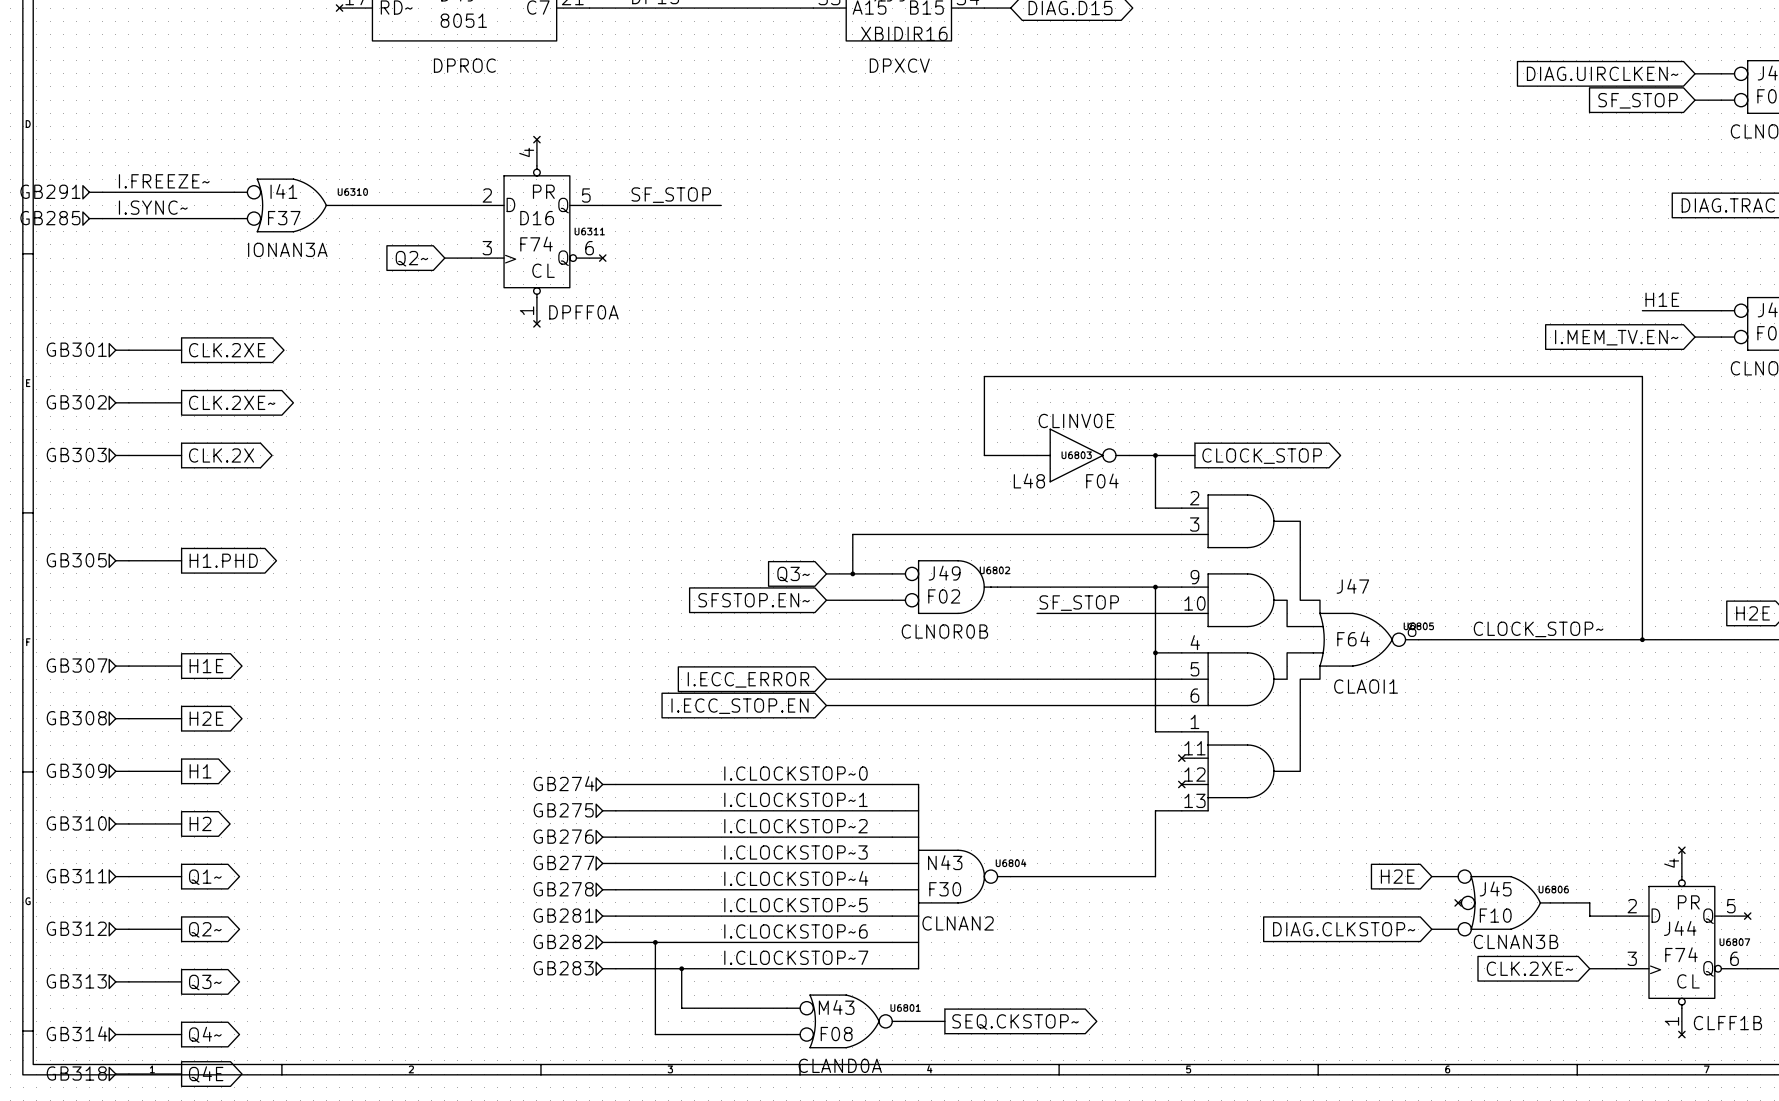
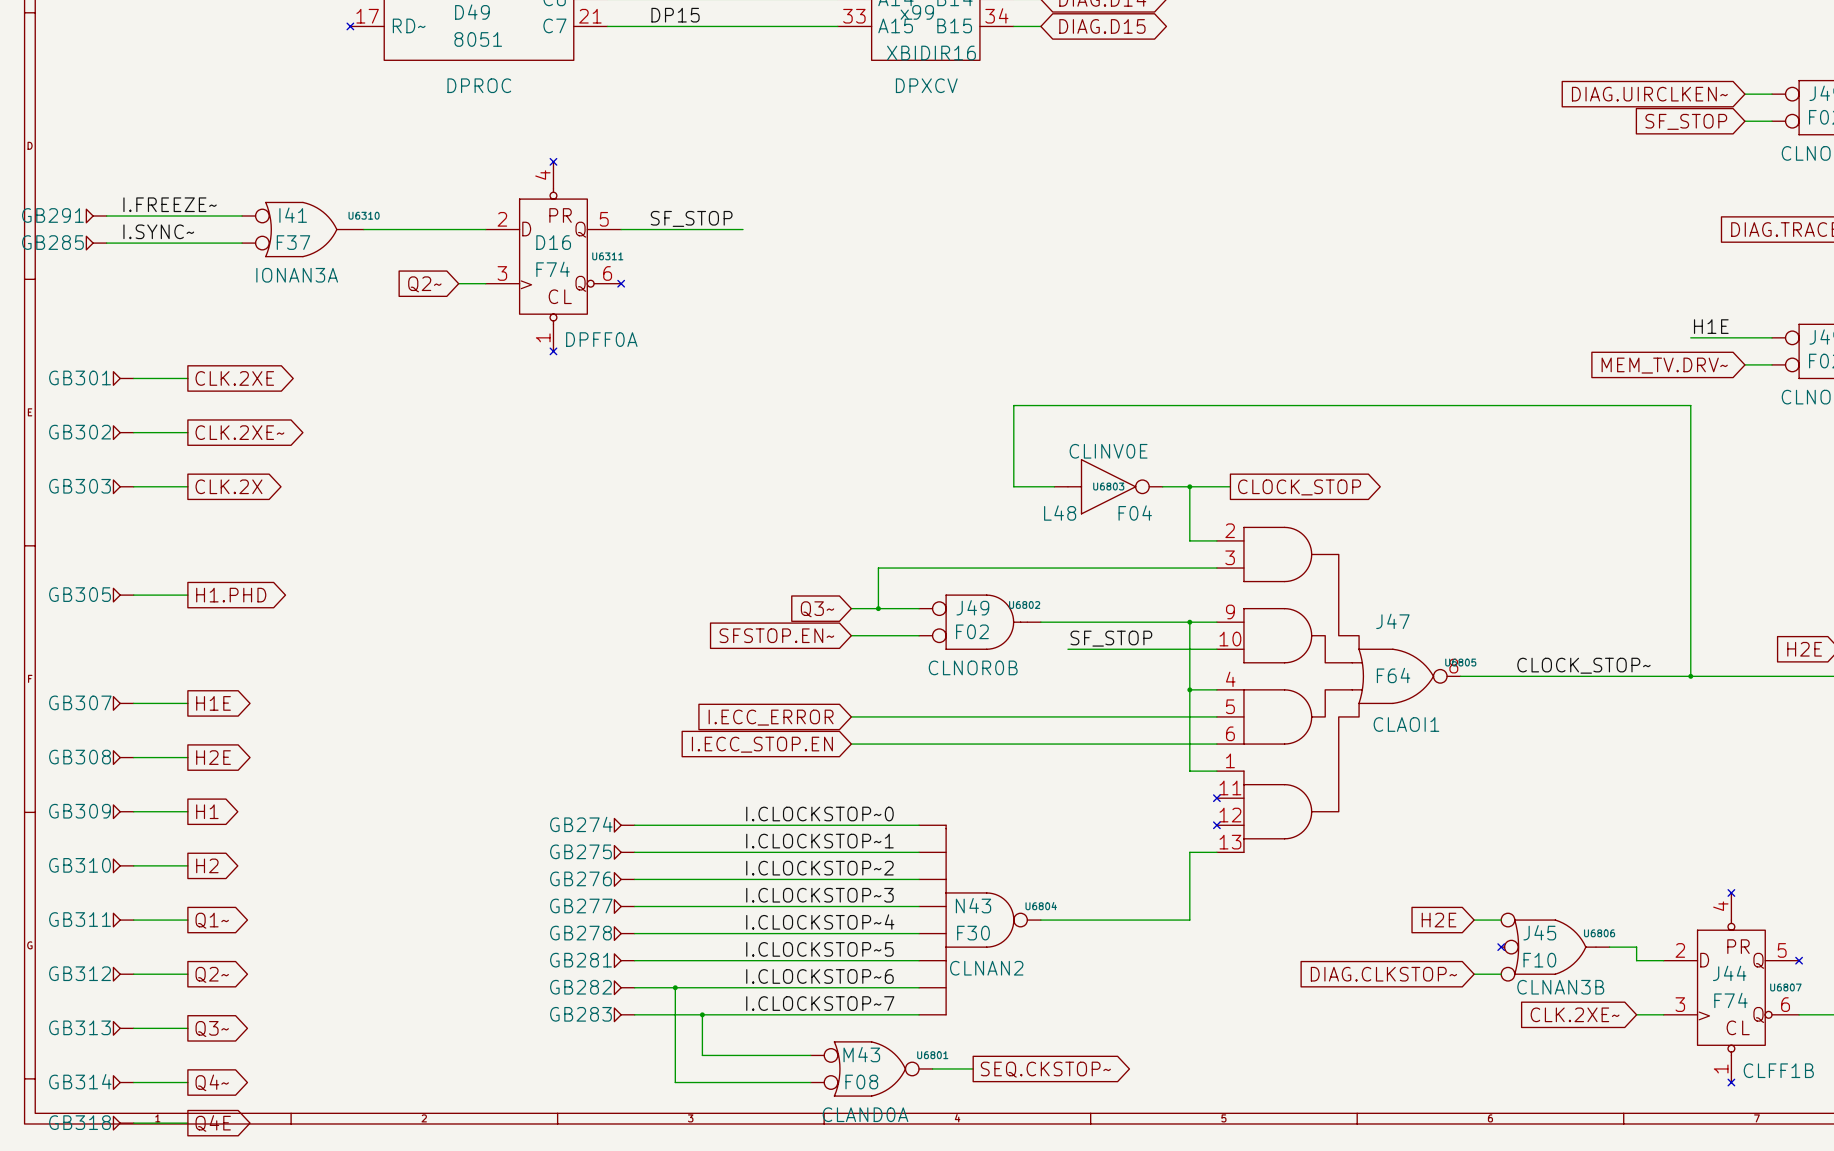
global label: I.MEM_TV.EN~ (1616, 337) -> MEM_TV.DRV~ (1664, 365)

